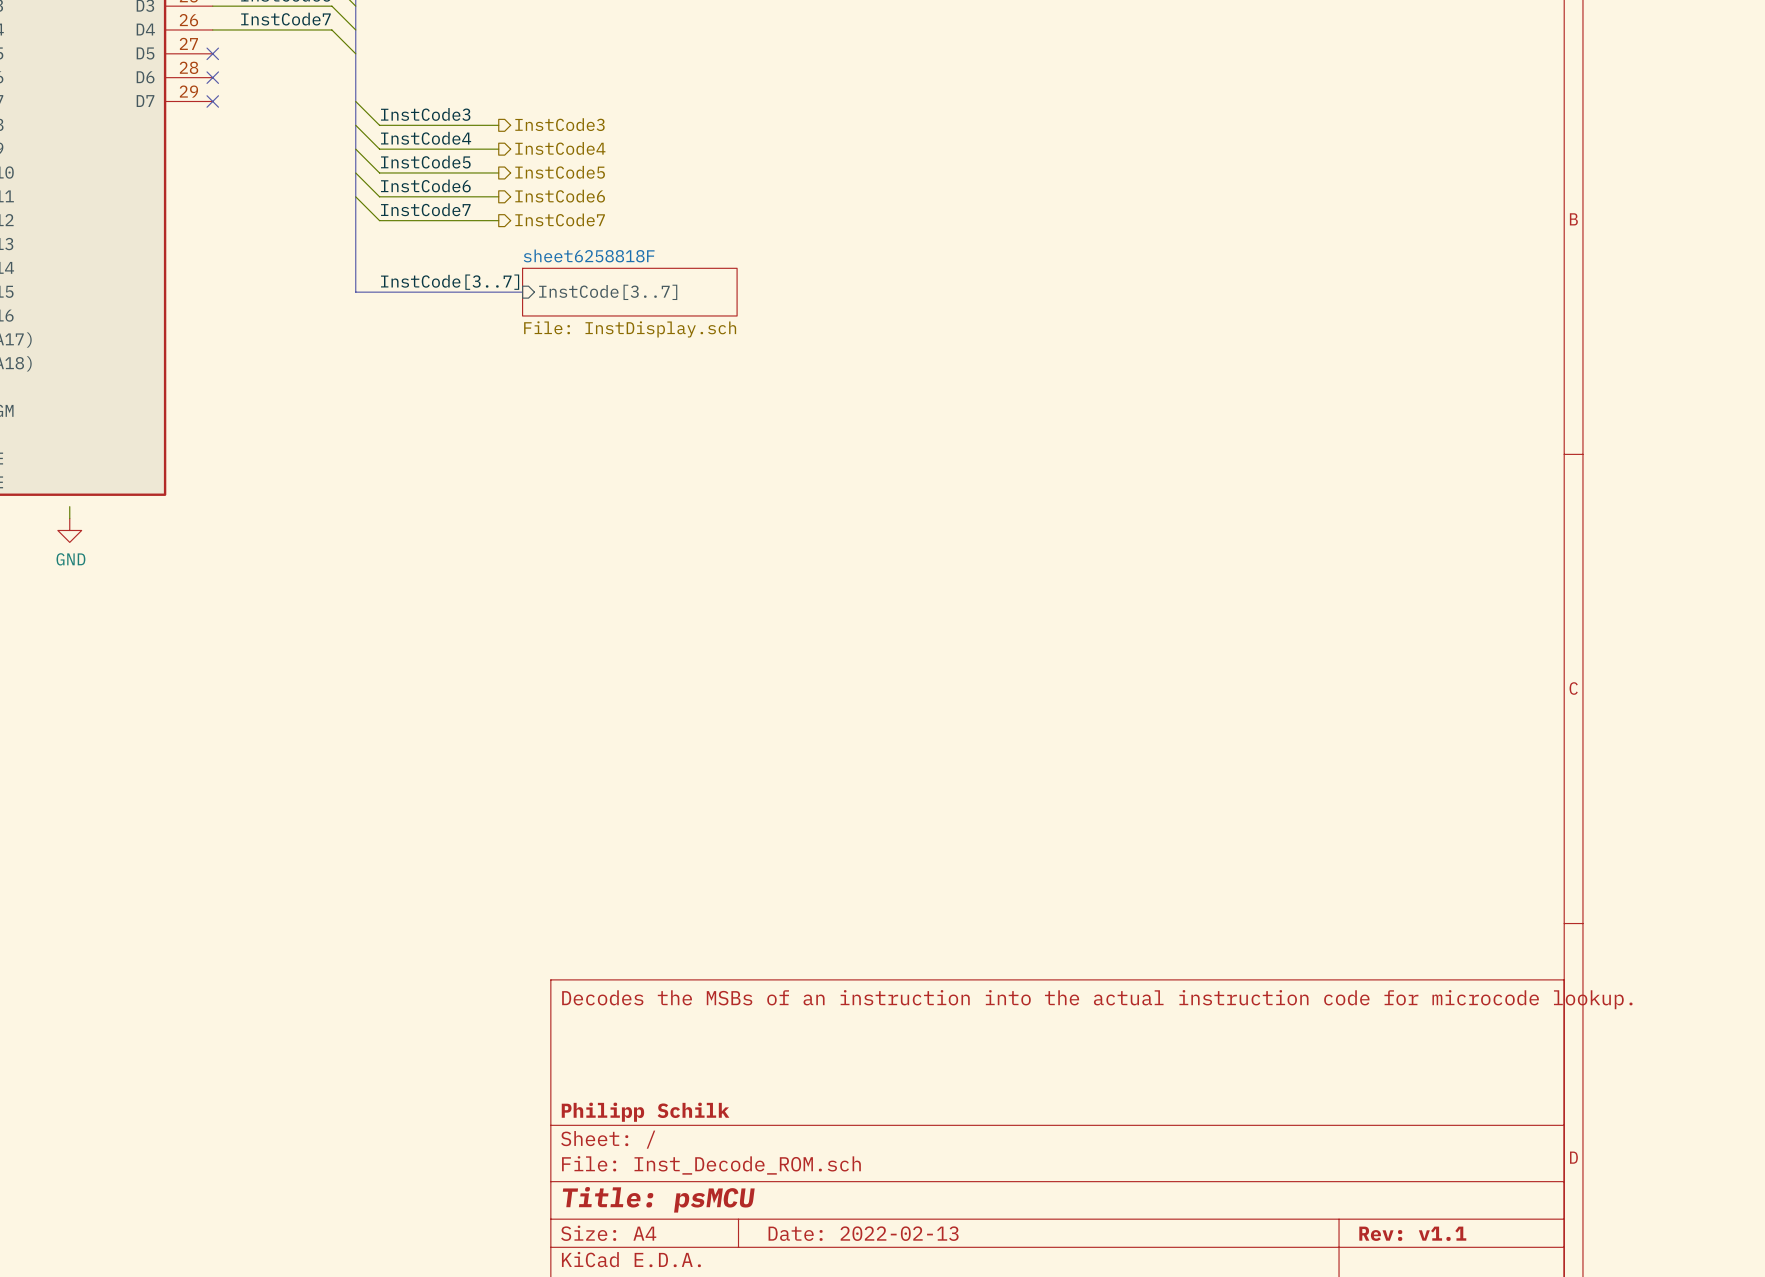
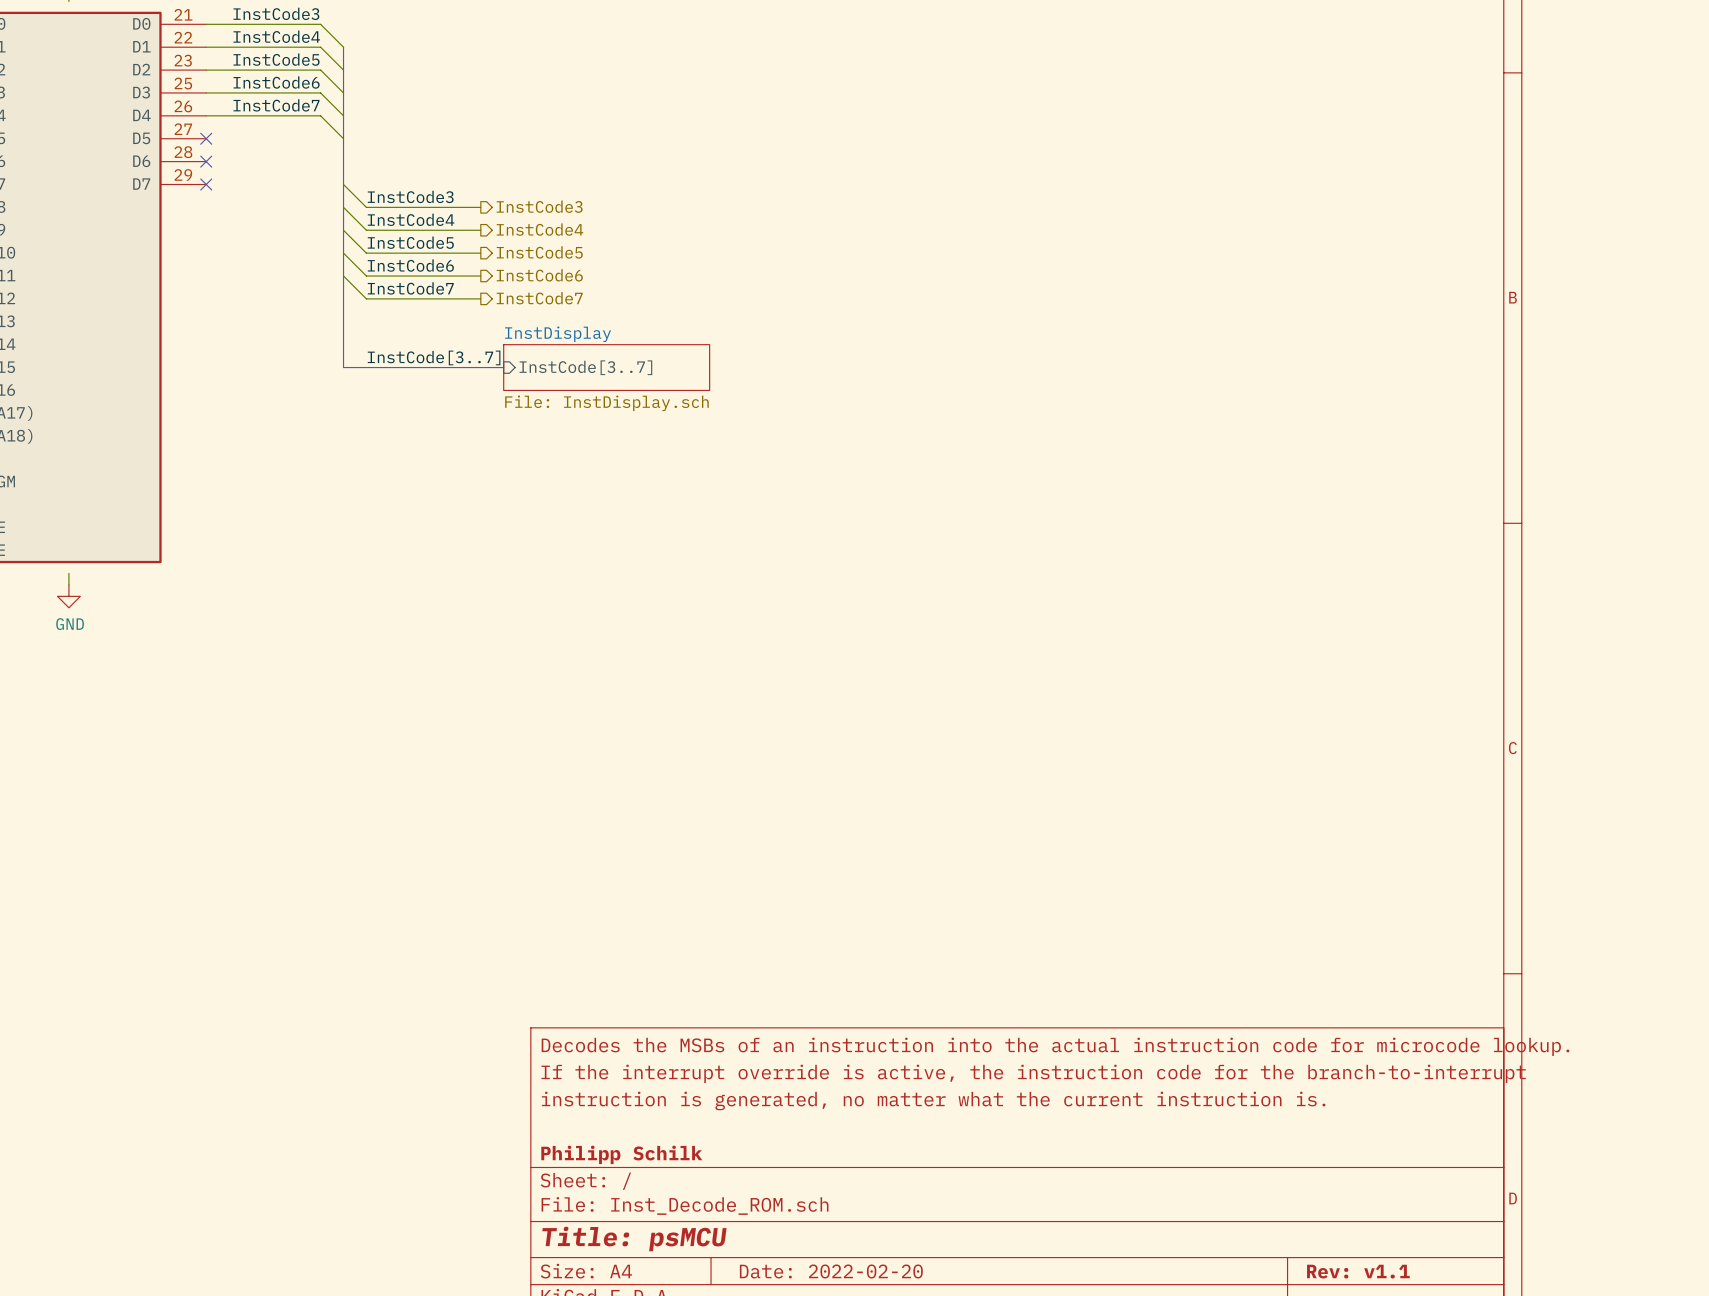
sheet sheet6258818F name: sheet6258818F (589, 255) -> InstDisplay (558, 334)
title block: none -> If the interrupt override is active, the instruction code for the branch-to-interrupt (1033, 1073)
title block: none -> instruction is generated, no matter what the current instruction is. (933, 1100)
title block: Date: 2022-02-13 (863, 1233) -> Date: 2022-02-20 (831, 1271)

